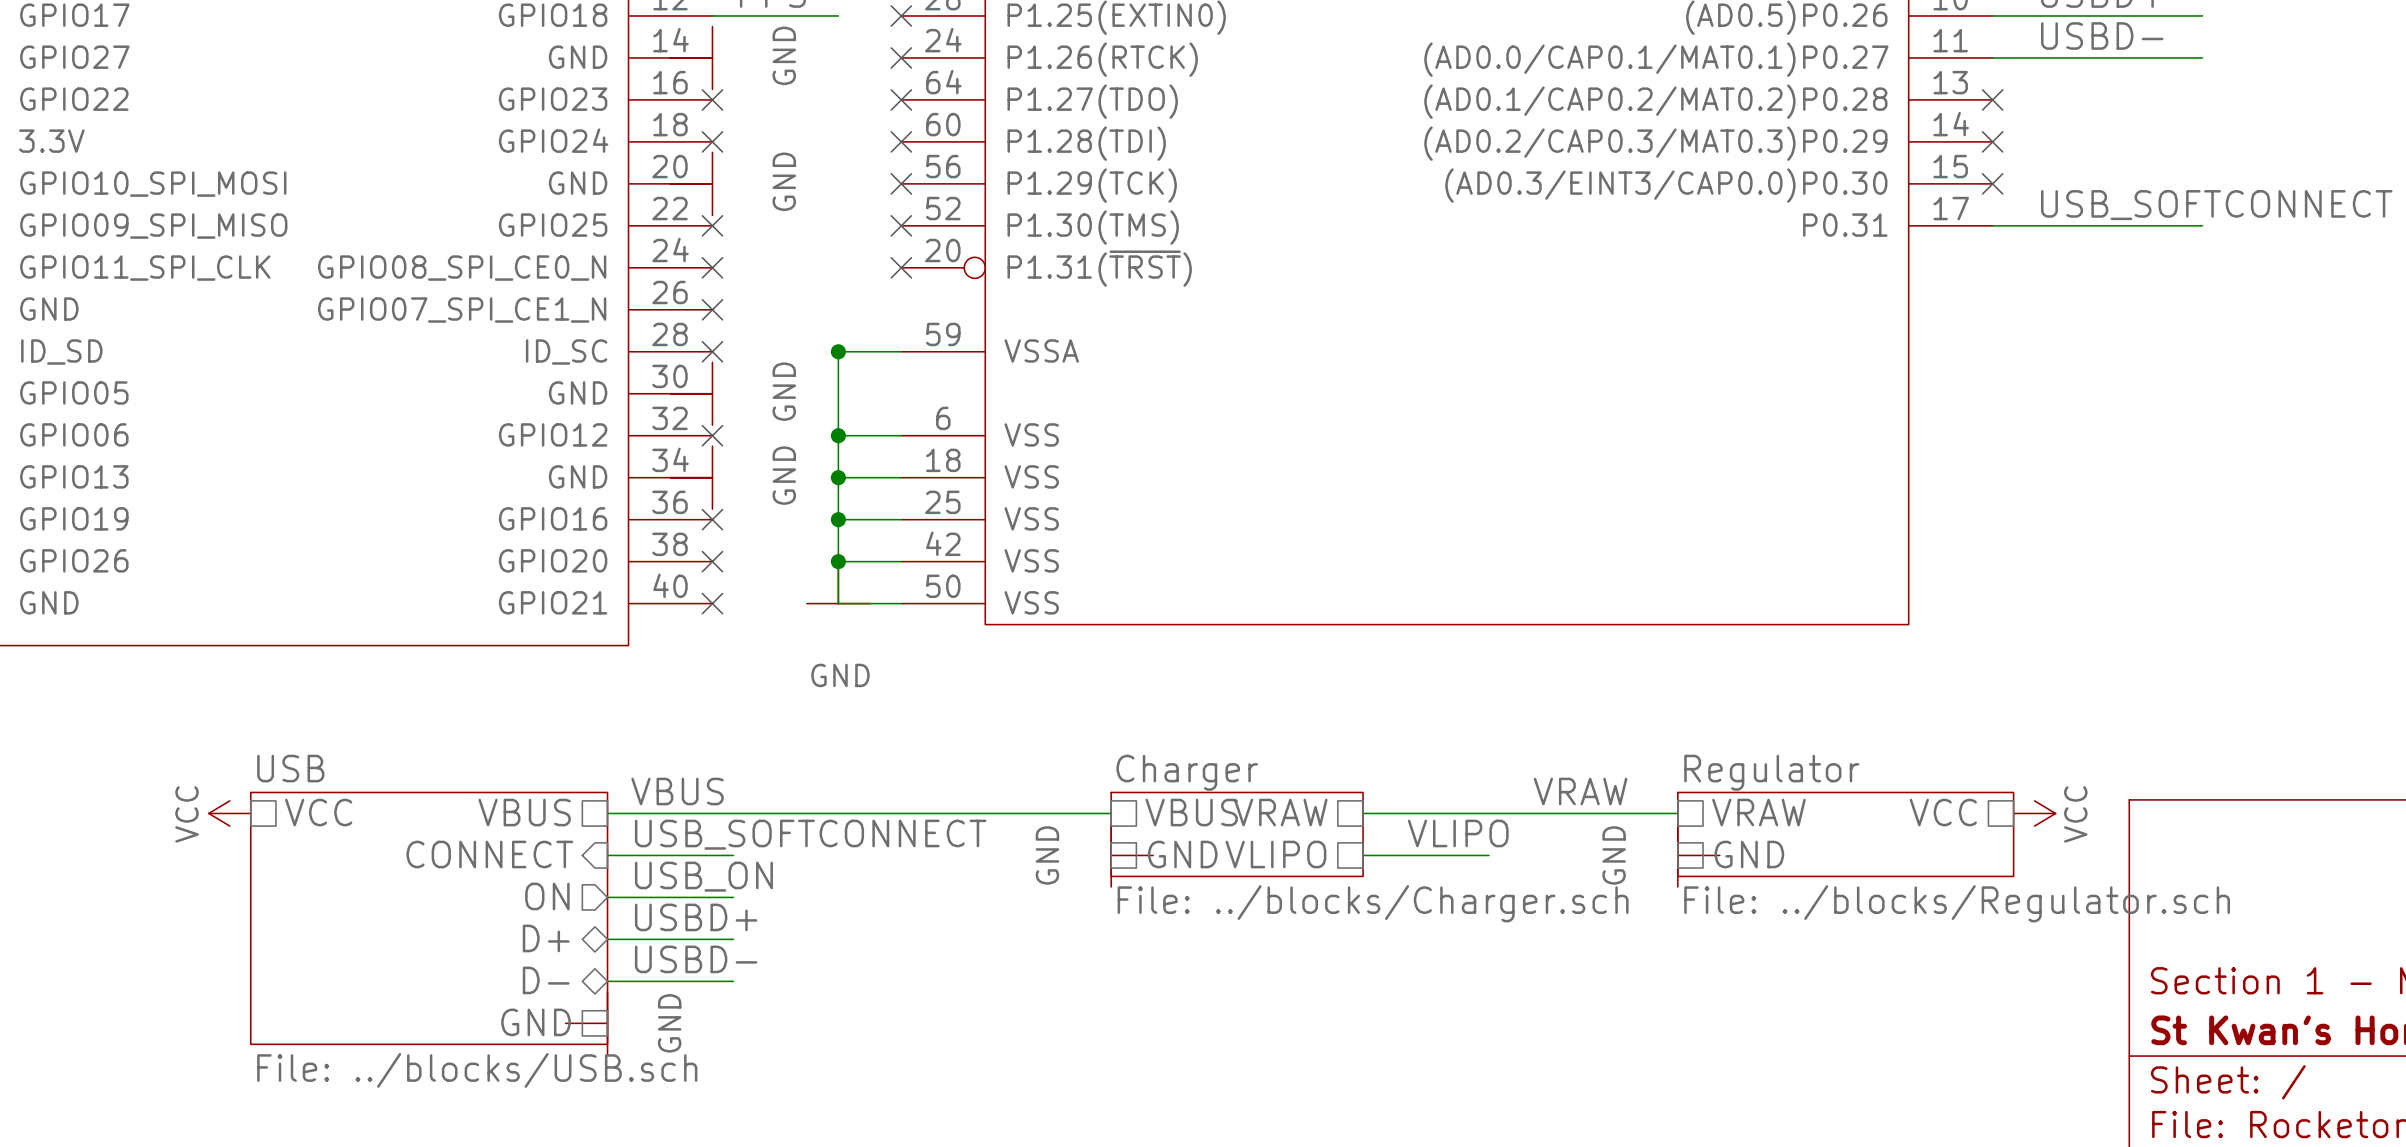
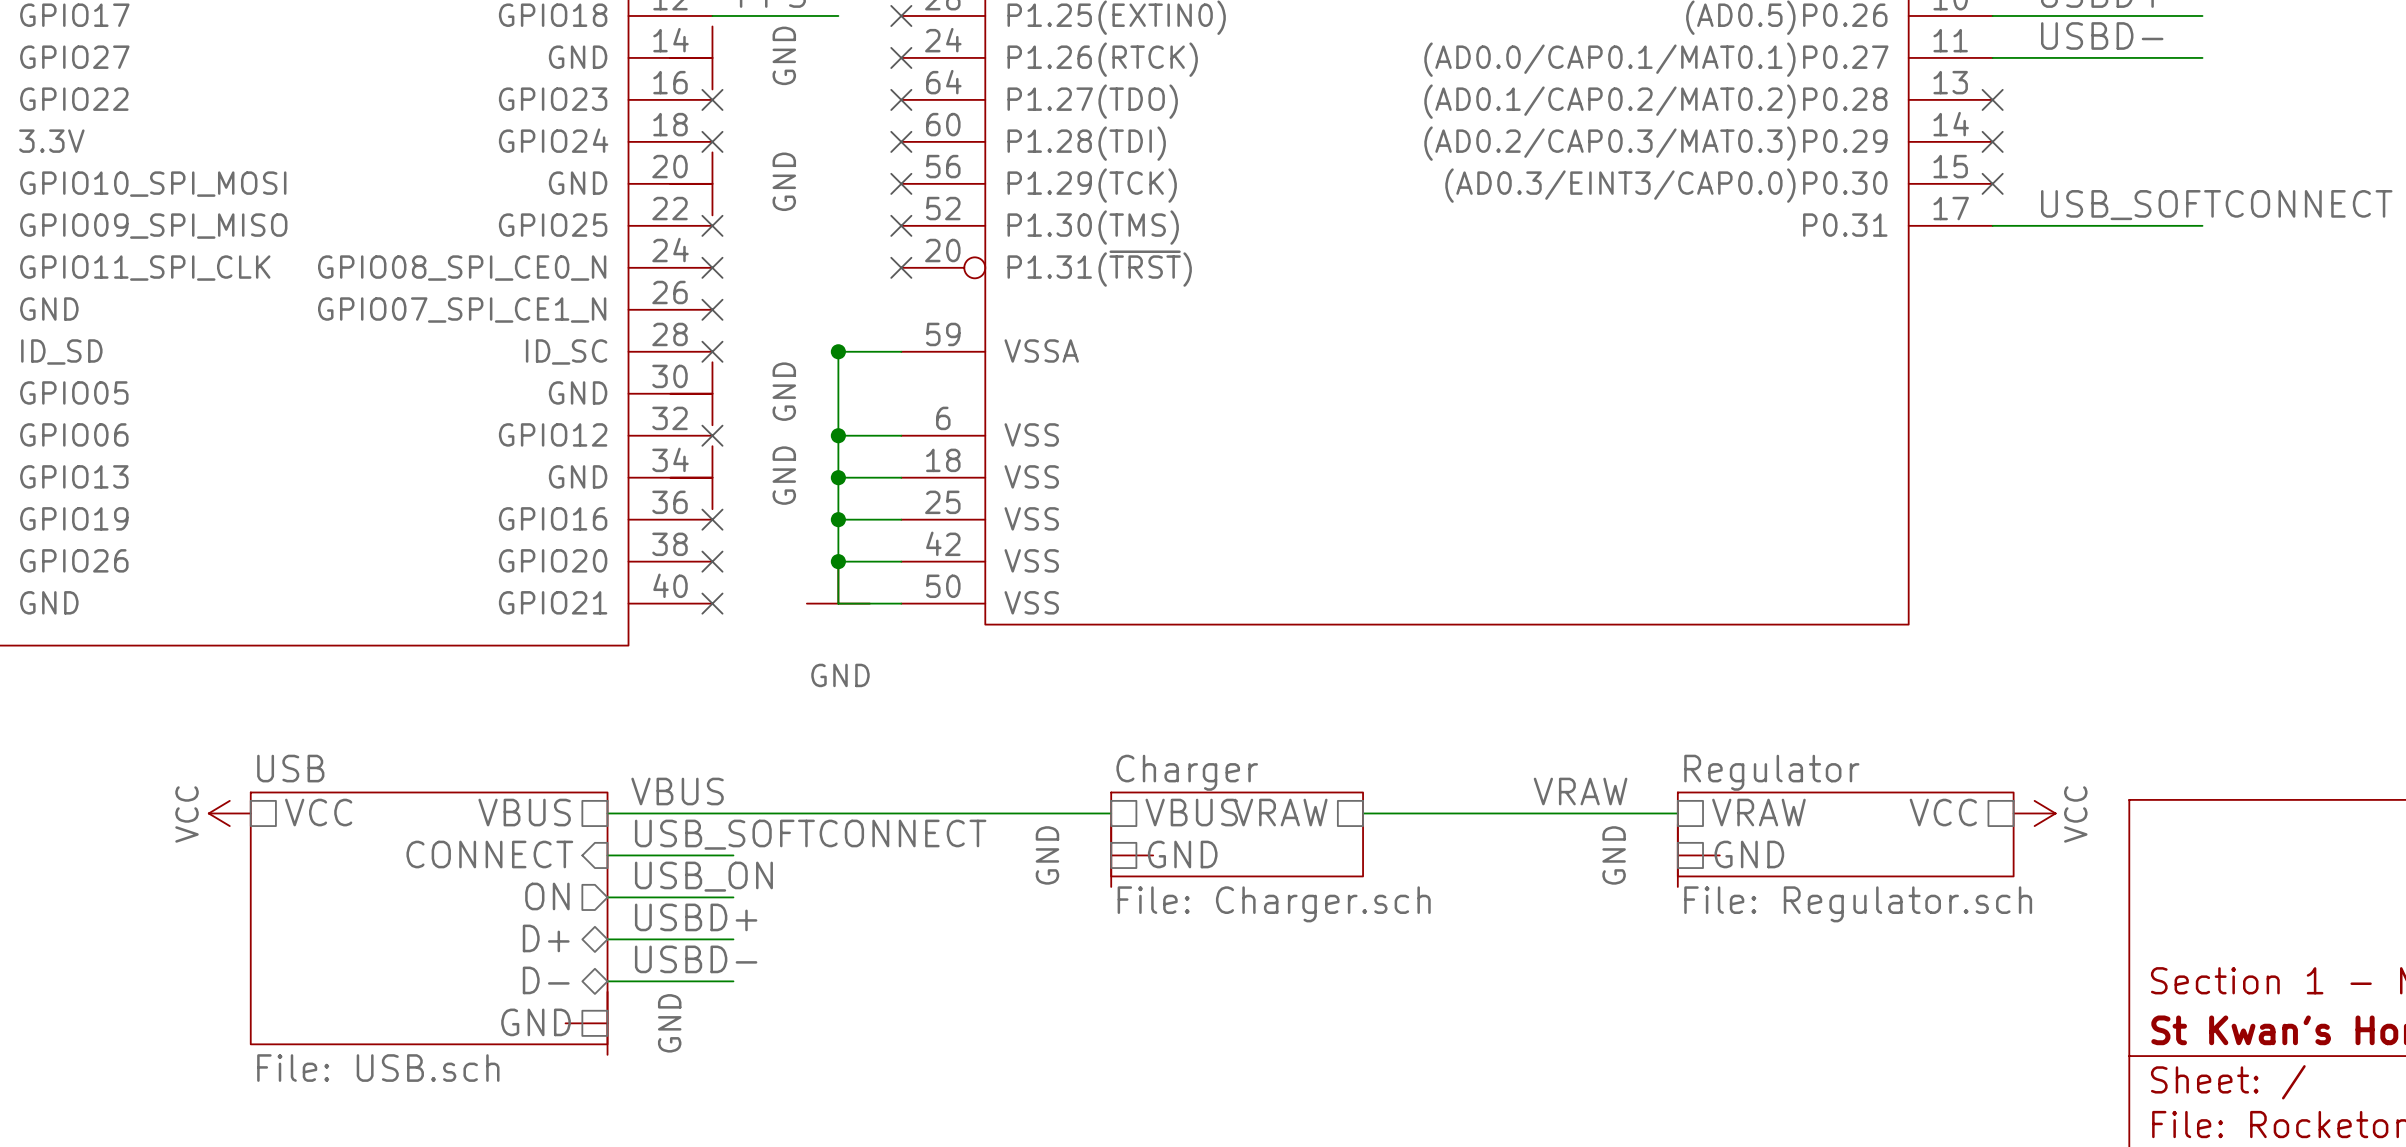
label: VLIPO (1458, 833) -> none
sheet pin: VLIPO (1275, 854) -> none
wire: (1363, 855) (1488, 855) -> none
sheet Charger value: File: ../blocks/Charger.sch (1373, 903) -> File: Charger.sch (1274, 904)
sheet Regulator value: File: ../blocks/Regulator.sch (1957, 903) -> File: Regulator.sch (1858, 904)
sheet USB value: File: ../blocks/USB.sch (477, 1070) -> File: USB.sch (378, 1068)

